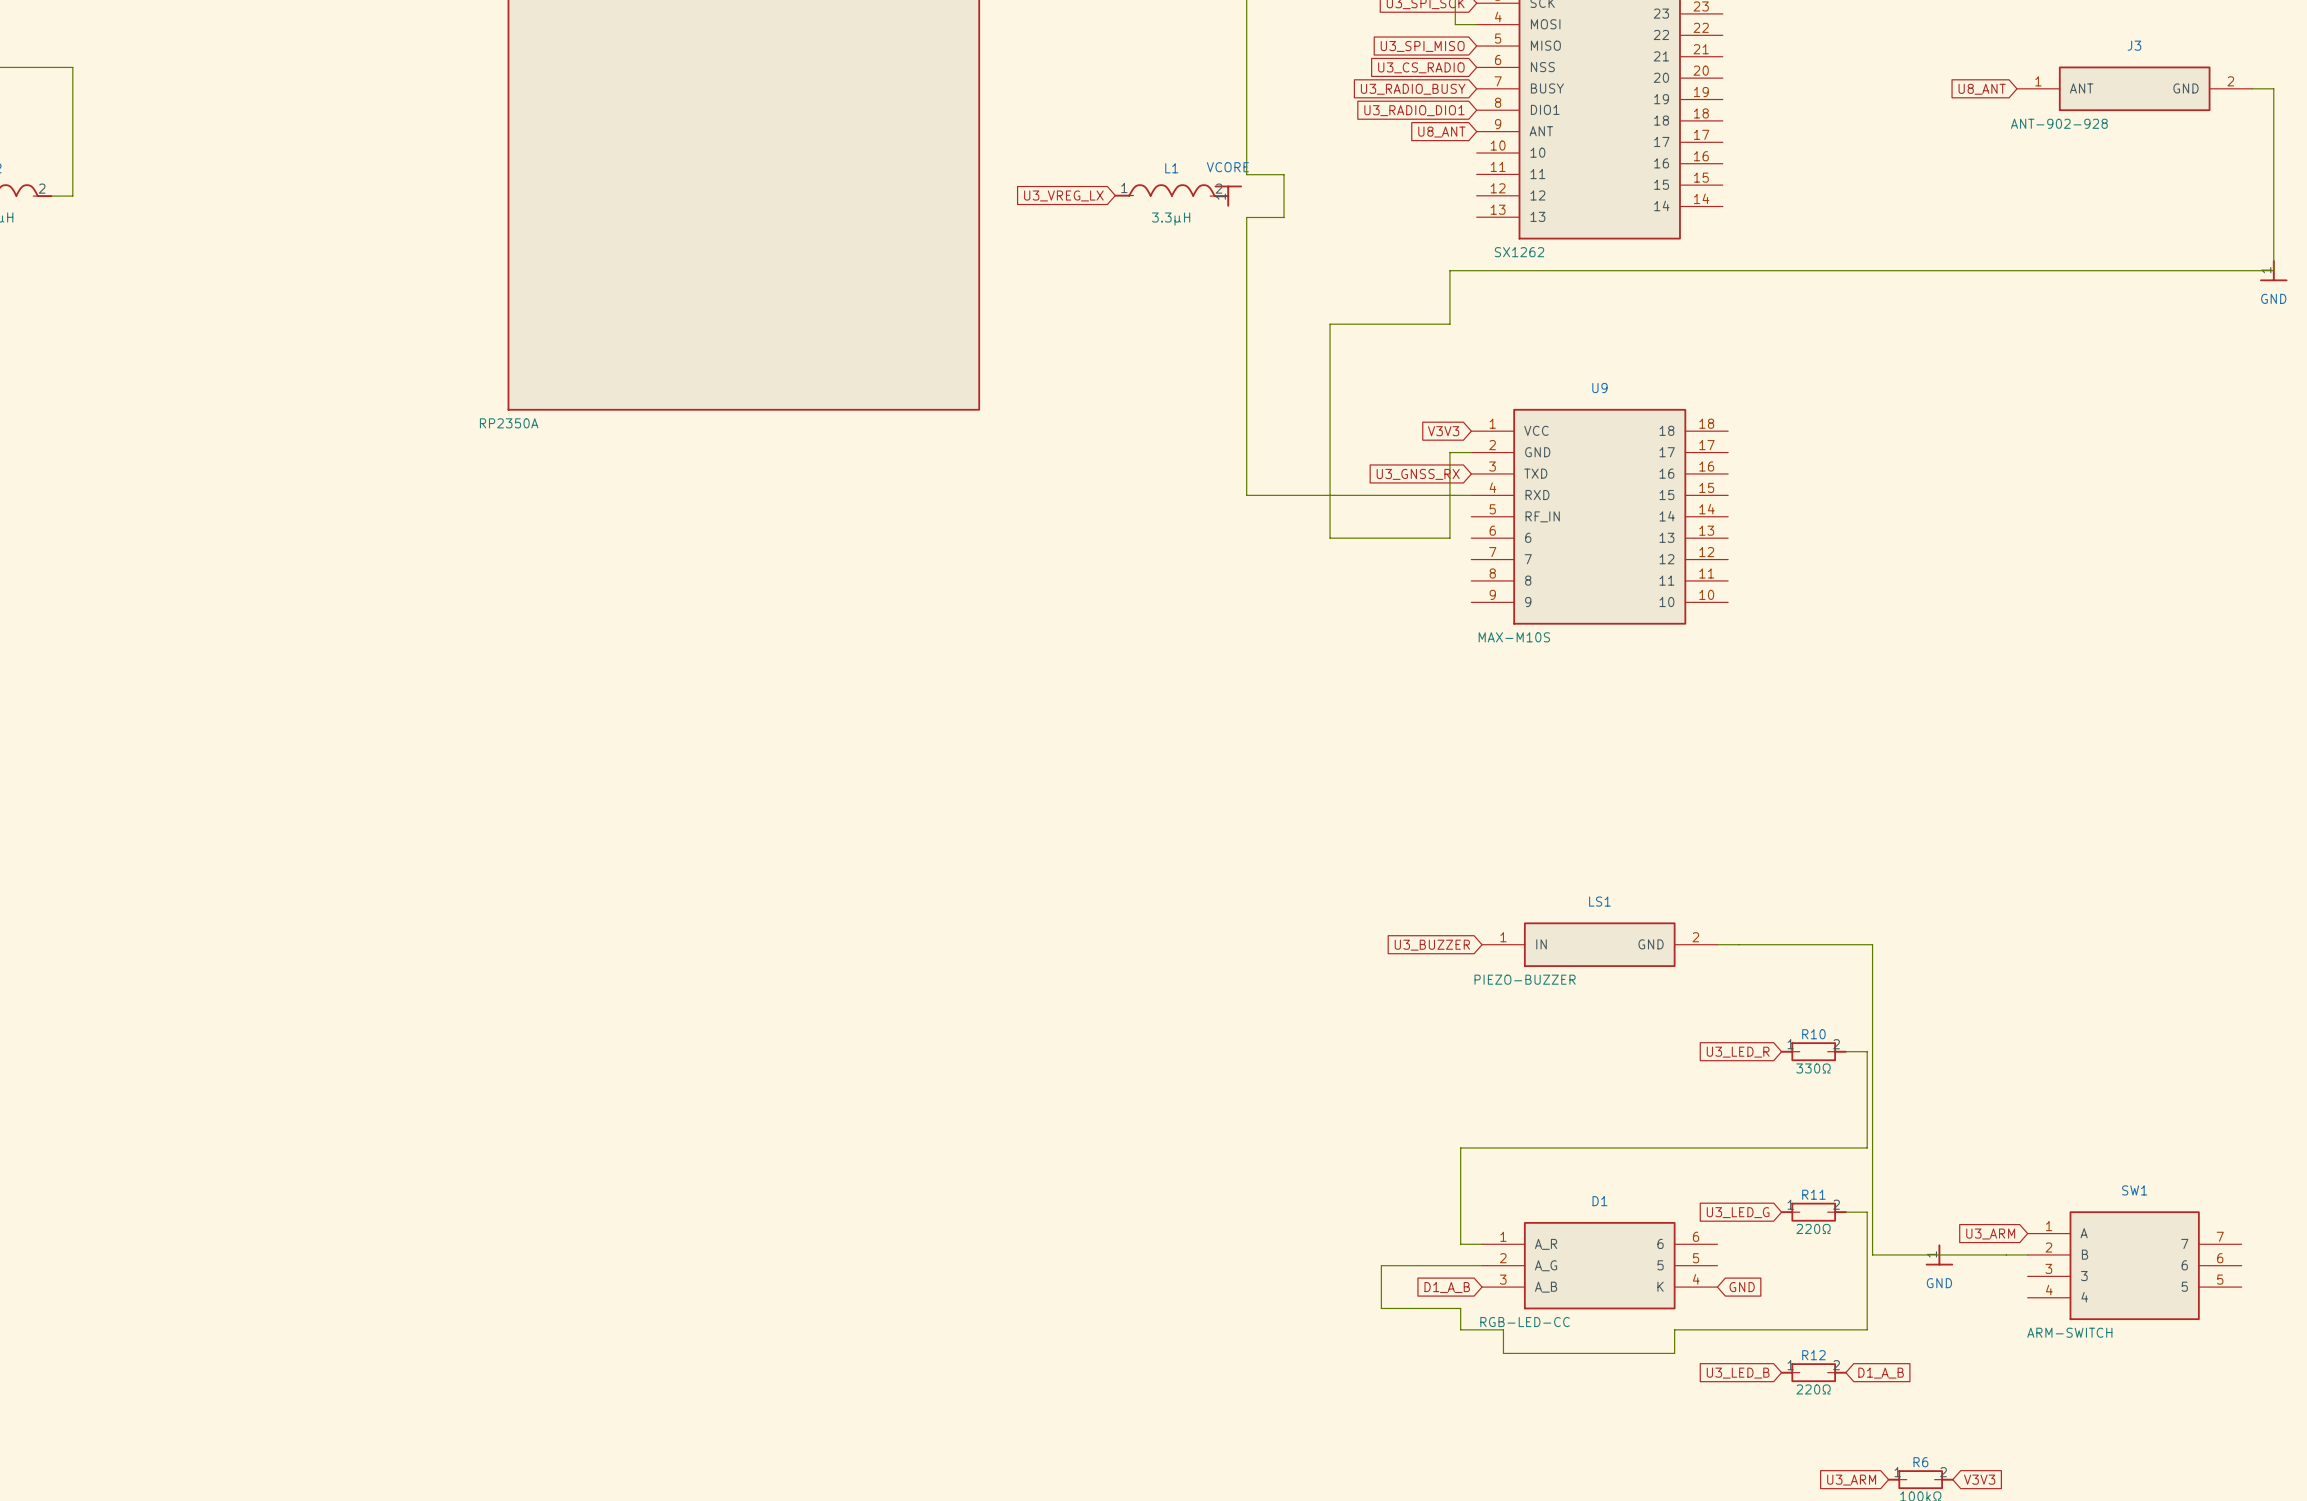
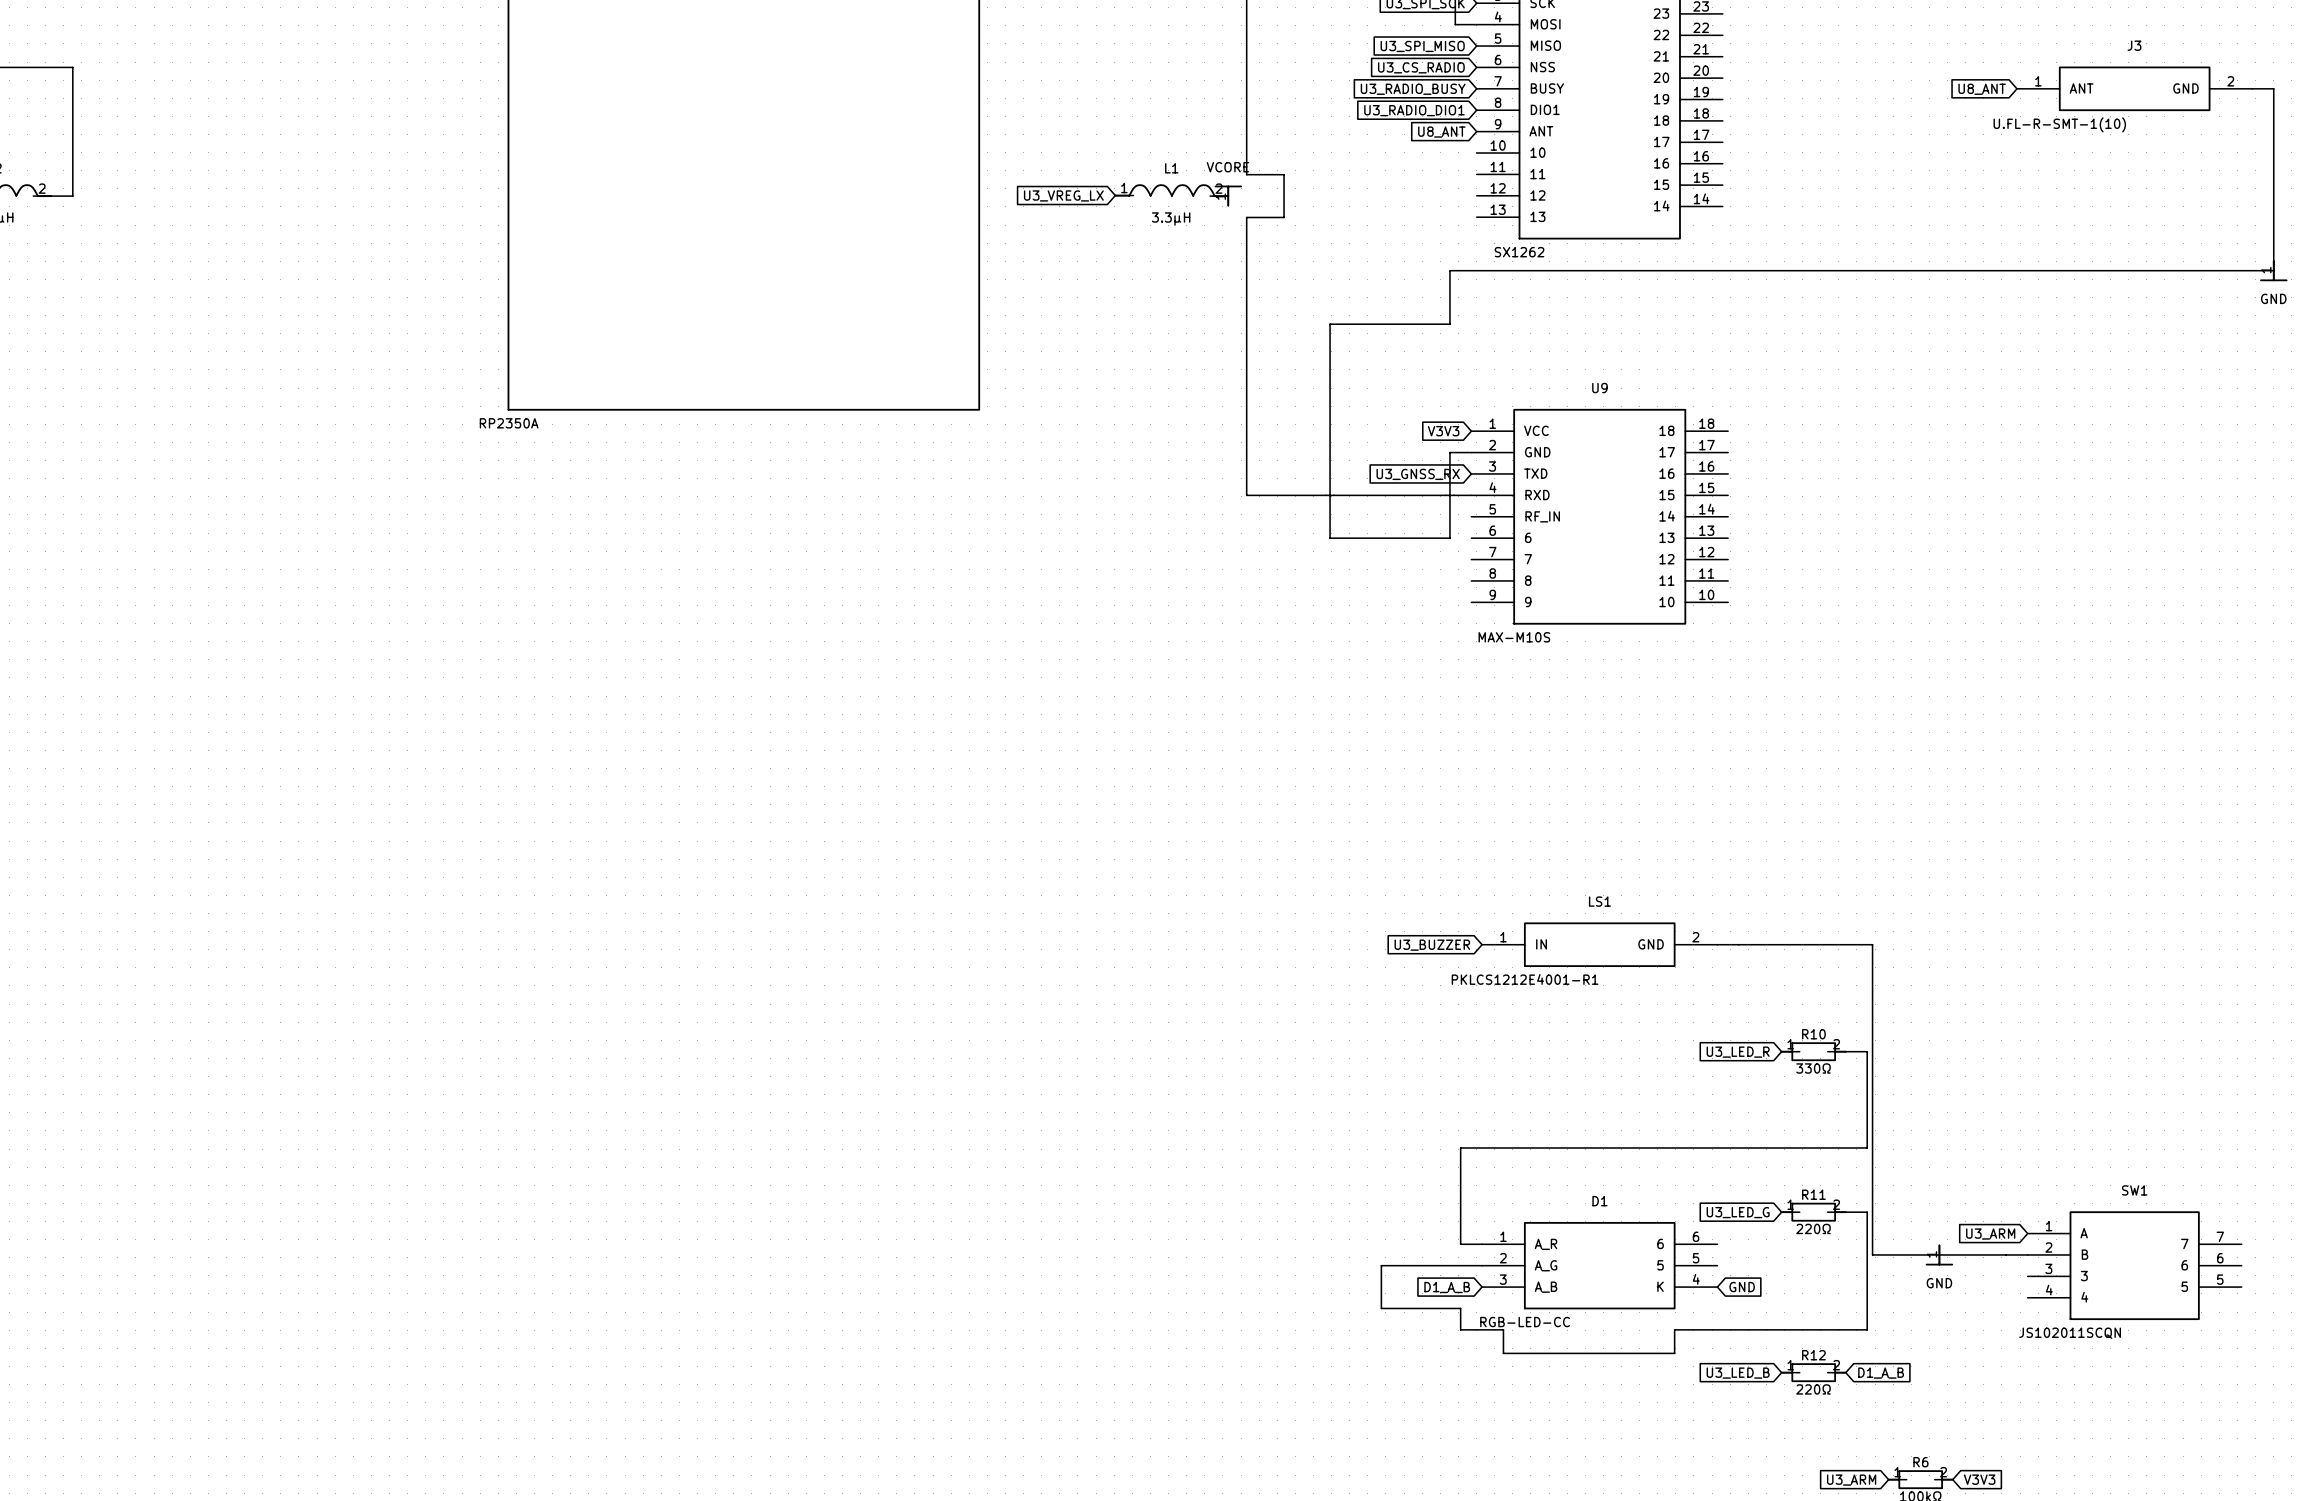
J3 value: ANT-902-928 (2059, 123) -> U.FL-R-SMT-1(10) (2059, 124)
LS1 value: PIEZO-BUZZER (1525, 979) -> PKLCS1212E4001-R1 (1525, 979)
SW1 value: ARM-SWITCH (2069, 1332) -> JS102011SCQN (2070, 1333)

